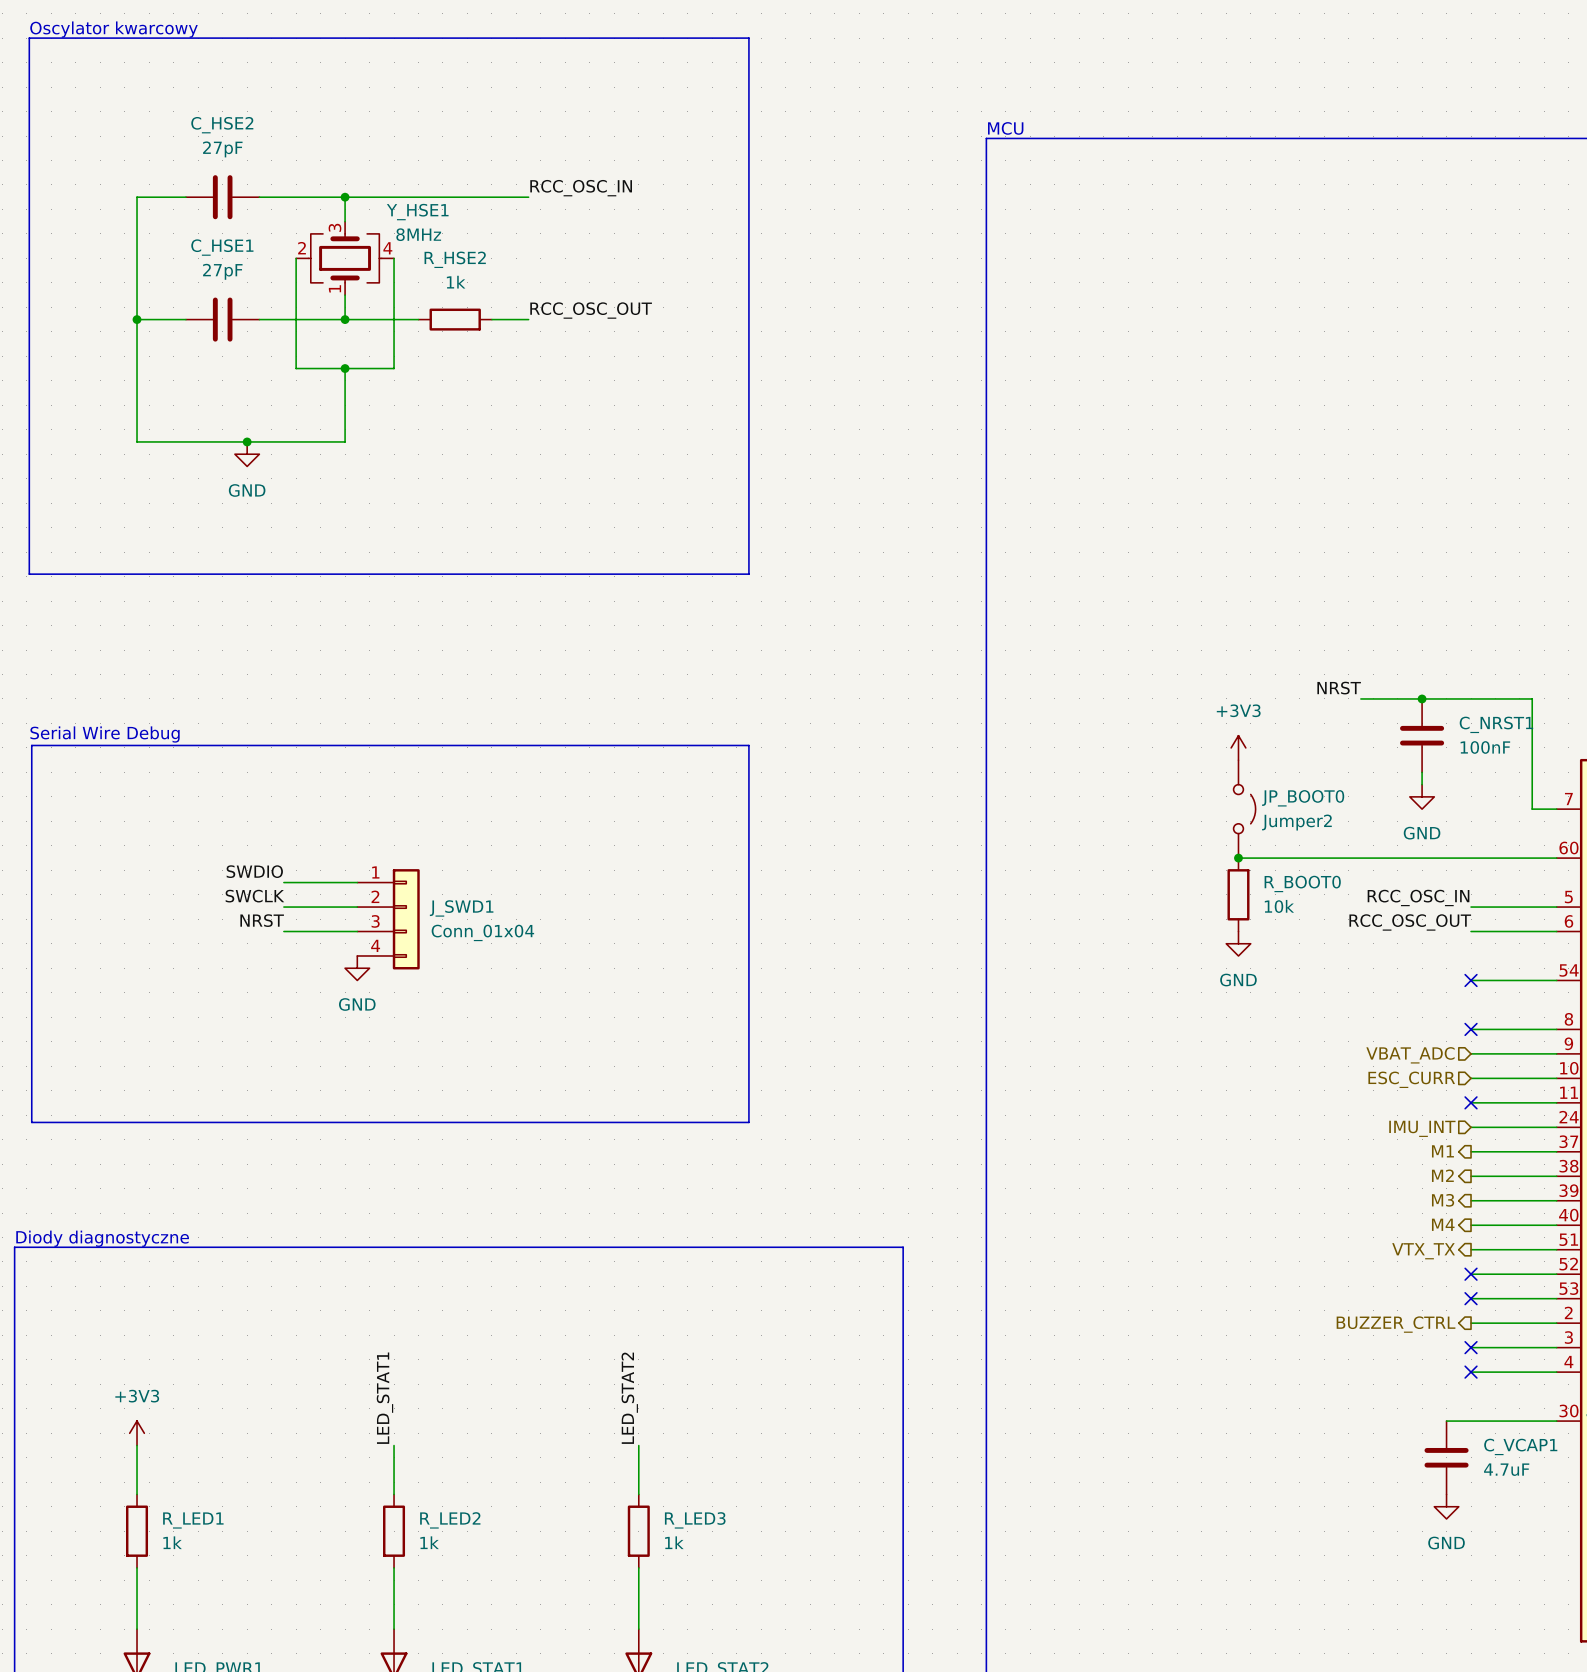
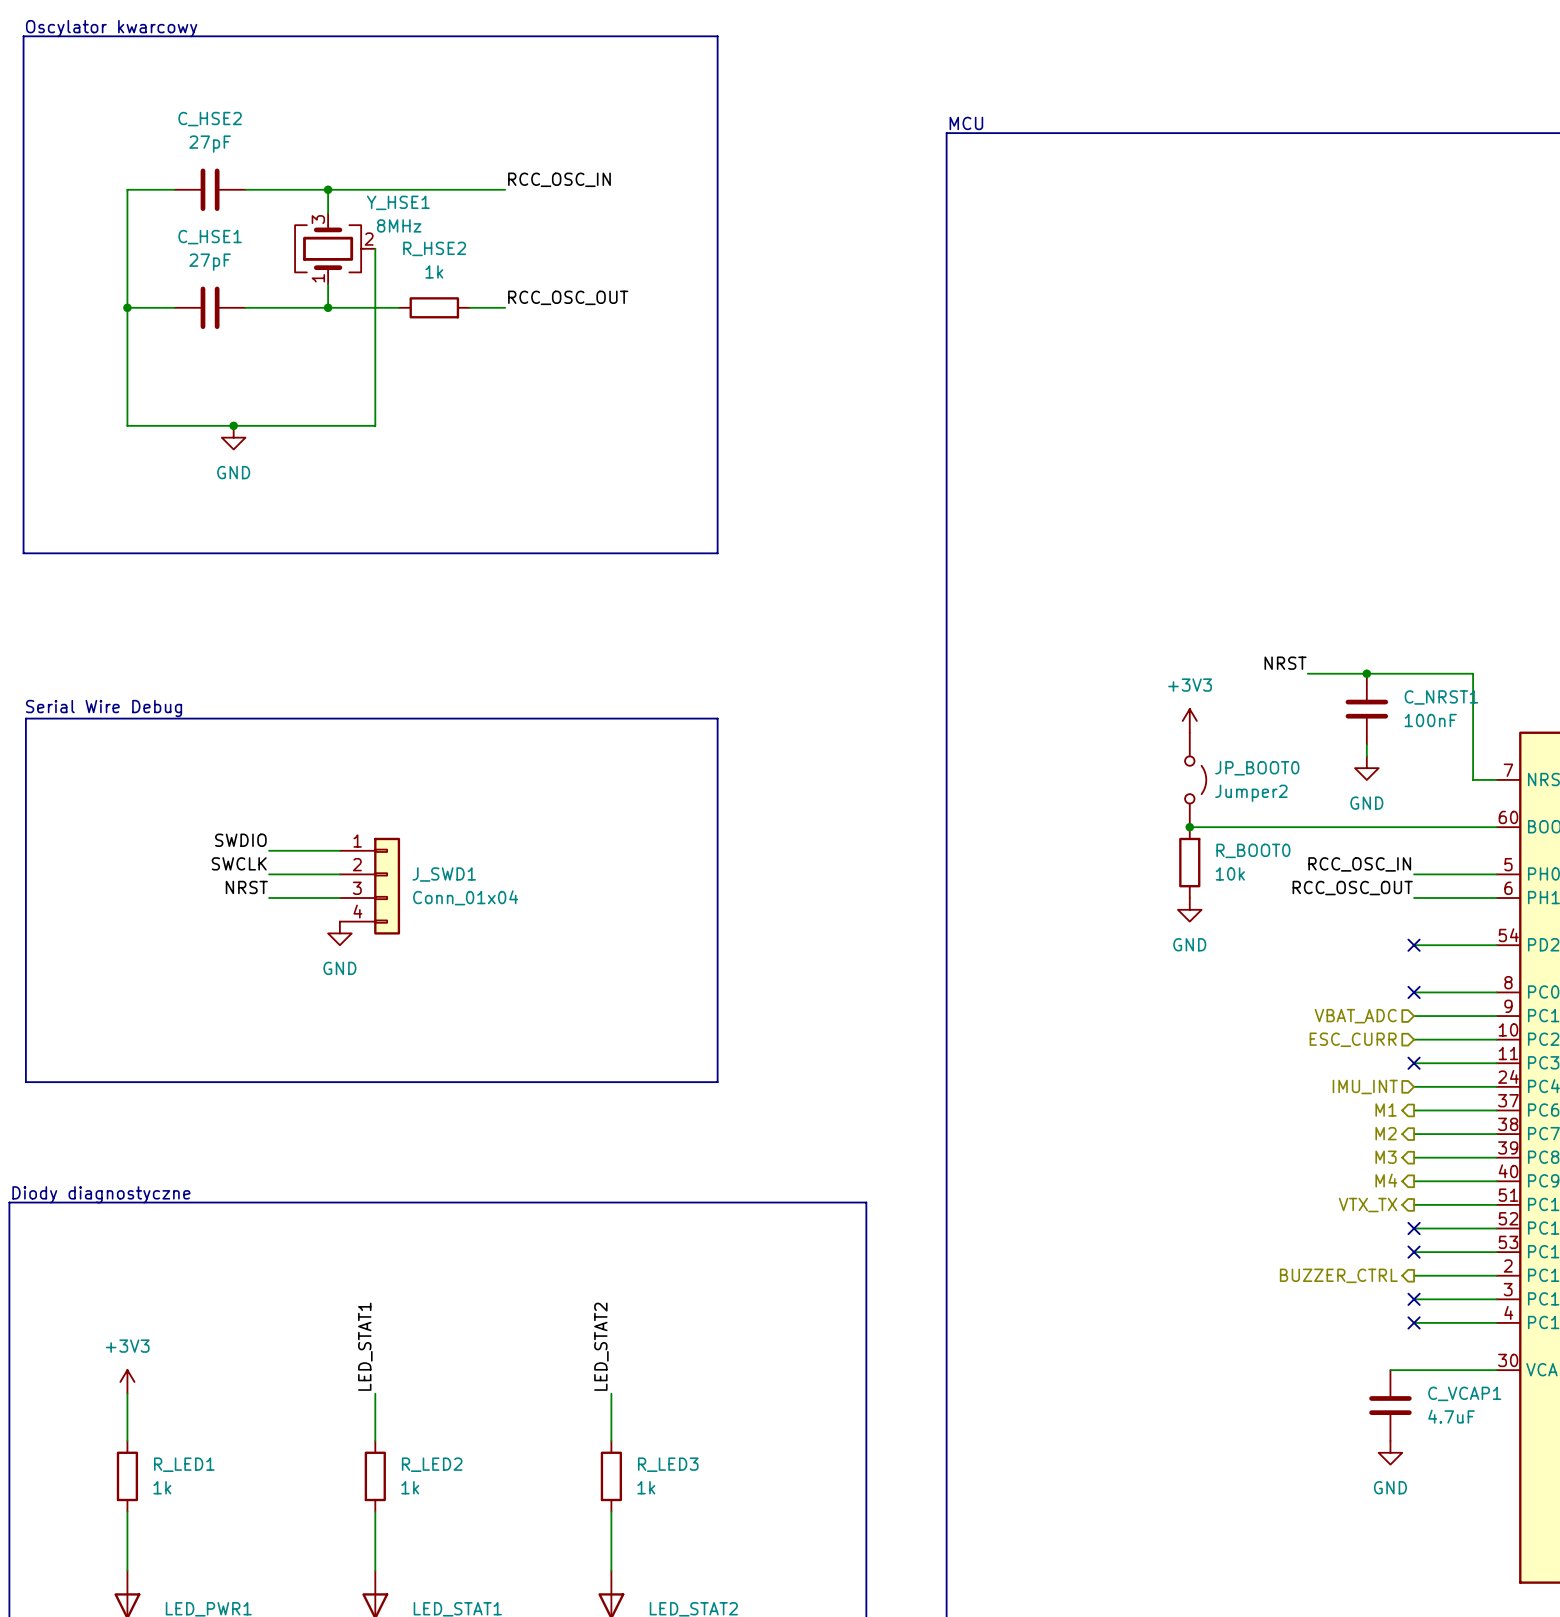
Y_HSE1 symbol: [296, 221, 395, 296] -> [295, 213, 376, 285]
wire: (296, 258) (296, 368) (394, 368) -> none
wire: (345, 368) (345, 441) -> (375, 355) (375, 425) (328, 425)
junction: (345, 368) -> none

